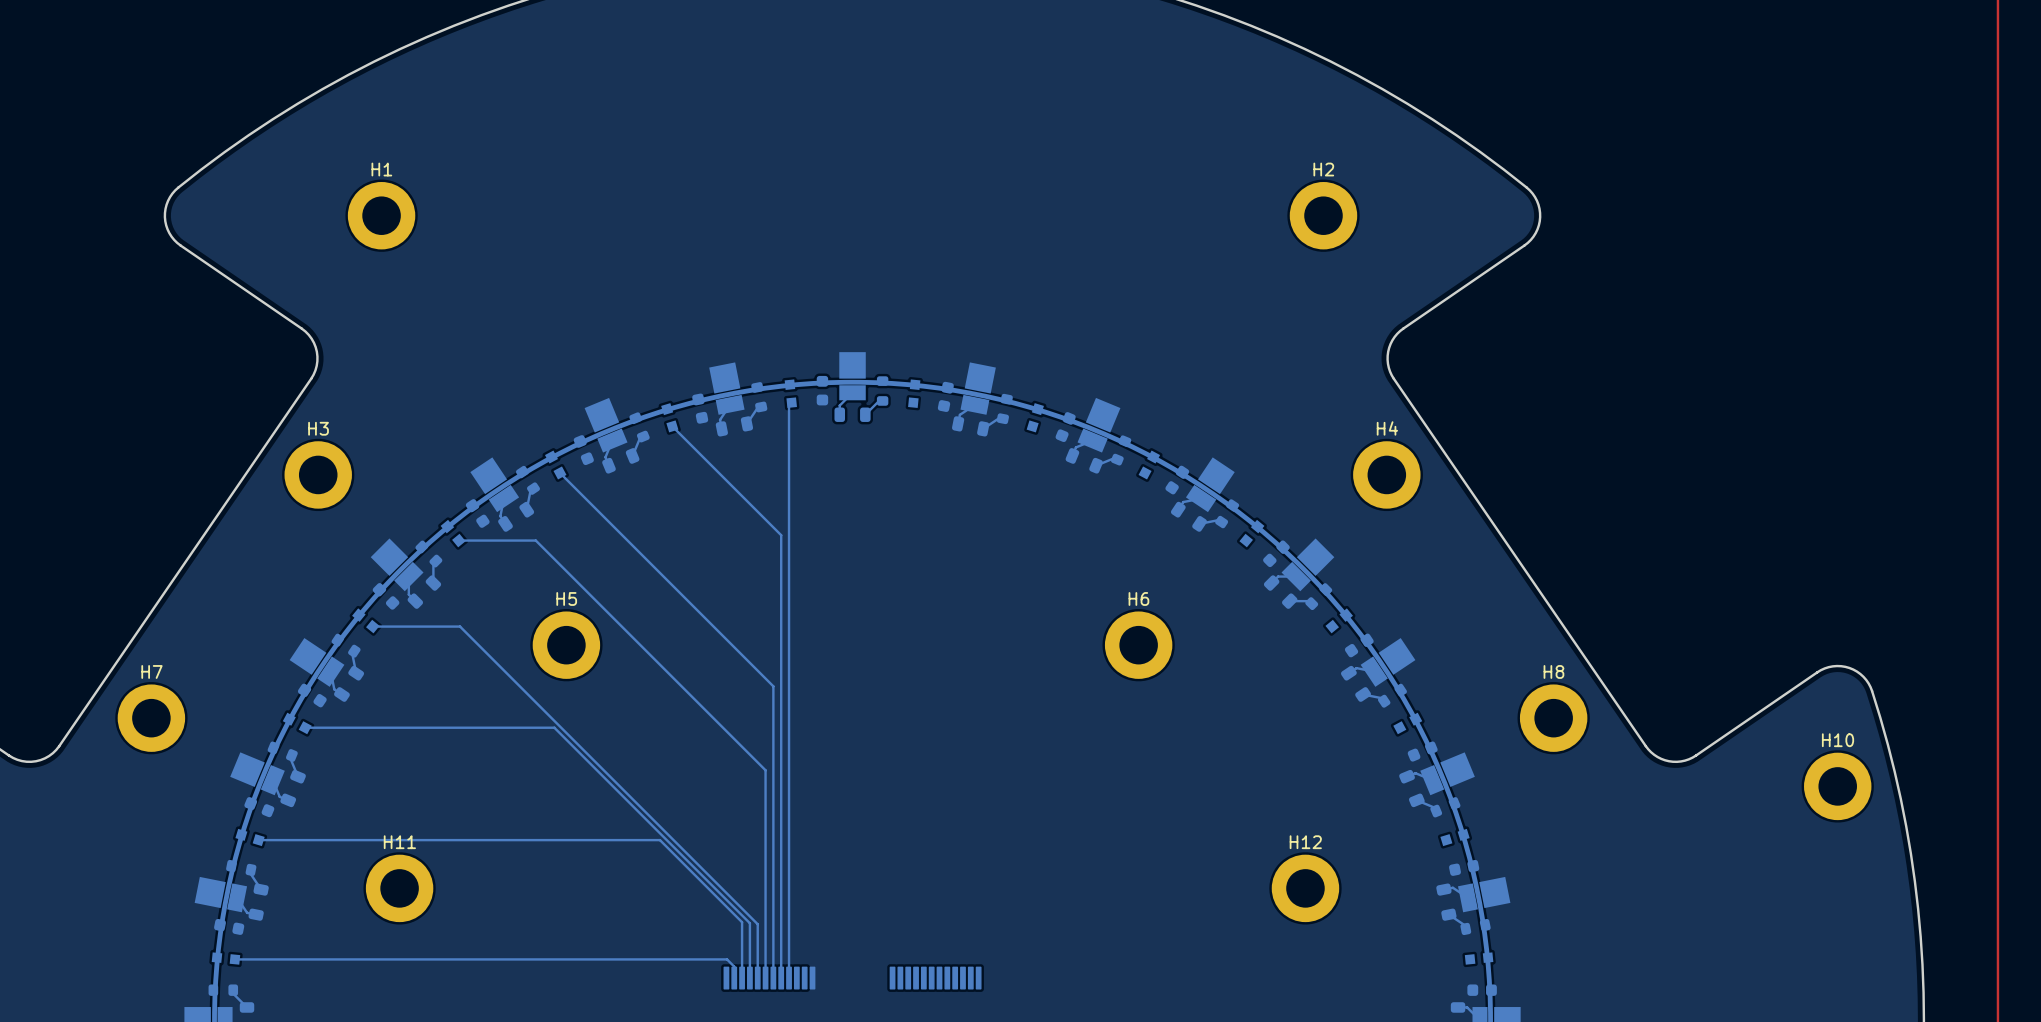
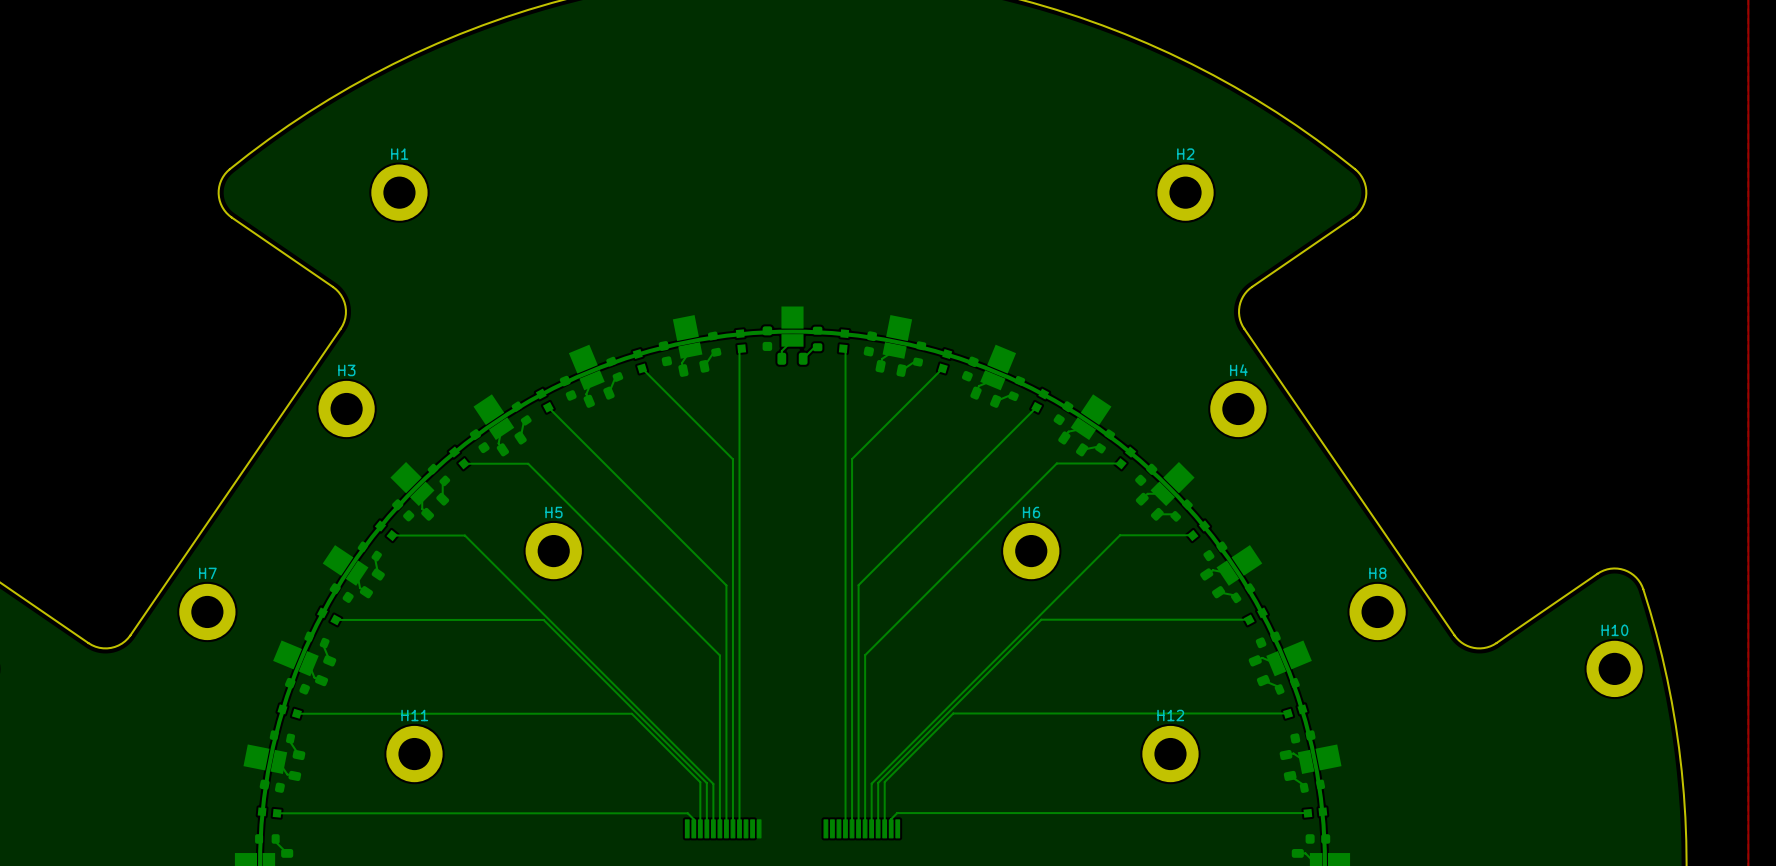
bottom track: none -> (845, 350) (845, 828)
bottom track: none -> (942, 368) (852, 459) (852, 828)
bottom track: none -> (1036, 407) (858, 585) (858, 828)
bottom track: none -> (1121, 463) (1056, 463) (865, 655) (865, 828)
bottom track: none -> (1192, 535) (1120, 535) (871, 783) (871, 828)
bottom track: none -> (1249, 619) (1041, 619) (878, 782) (878, 828)
bottom track: none -> (1288, 713) (953, 713) (884, 782) (884, 828)
bottom track: none -> (1307, 813) (897, 813) (891, 819) (891, 828)

